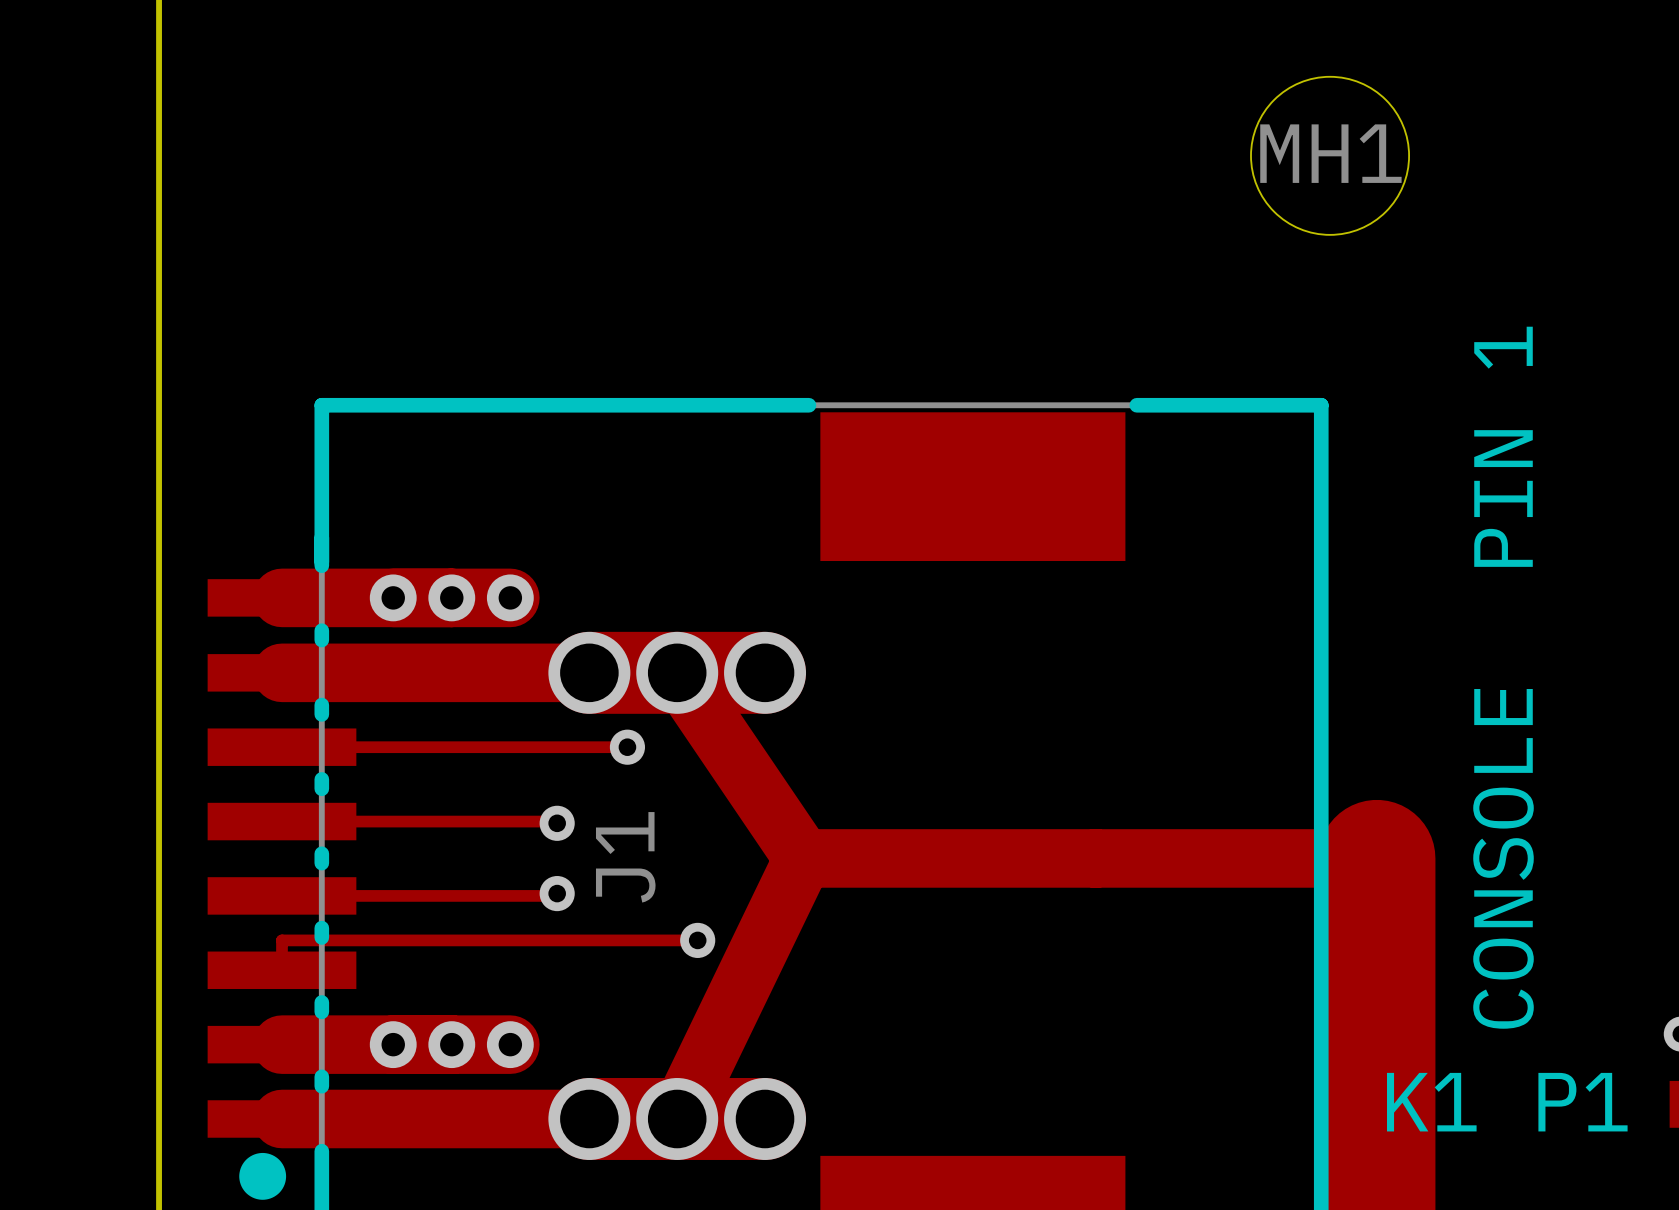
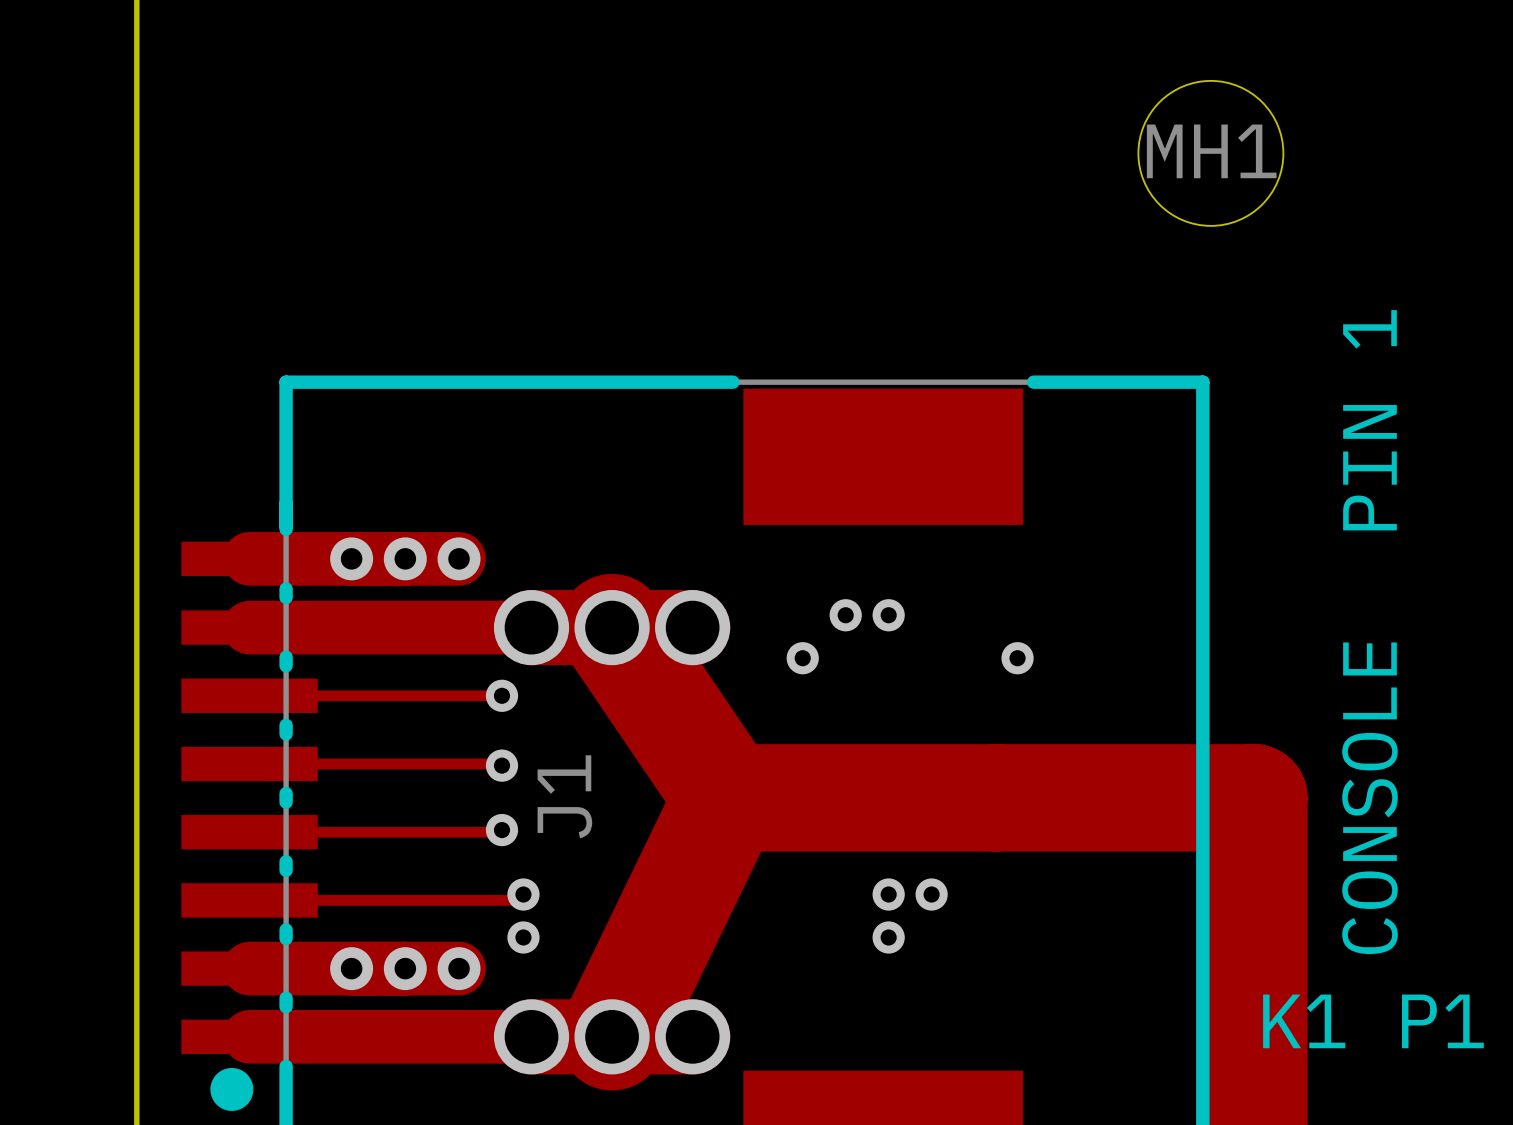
via: none -> (845, 615)
via: none -> (888, 615)
track width: thin (677, 672) (803, 858) -> thick (612, 627) (727, 797)
via: none -> (802, 658)
via: none -> (1017, 658)
track: (557, 747) (627, 747) -> none
via position: (627, 747) -> (501, 695)
track width: thin (803, 858) (1376, 858) -> thick (727, 797) (1253, 797)
track width: thin (803, 858) (677, 1118) -> thick (727, 797) (612, 1036)
track: (697, 940) (281, 940) (281, 970) -> (523, 894) (523, 900) (249, 900)
via: (697, 940) -> none
via: none -> (523, 894)
via: none -> (888, 894)
via: none -> (931, 894)
via: none -> (523, 937)
via: none -> (888, 937)

